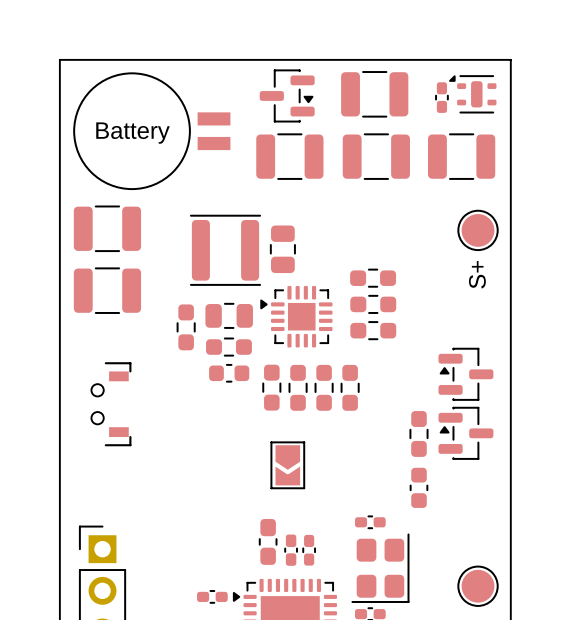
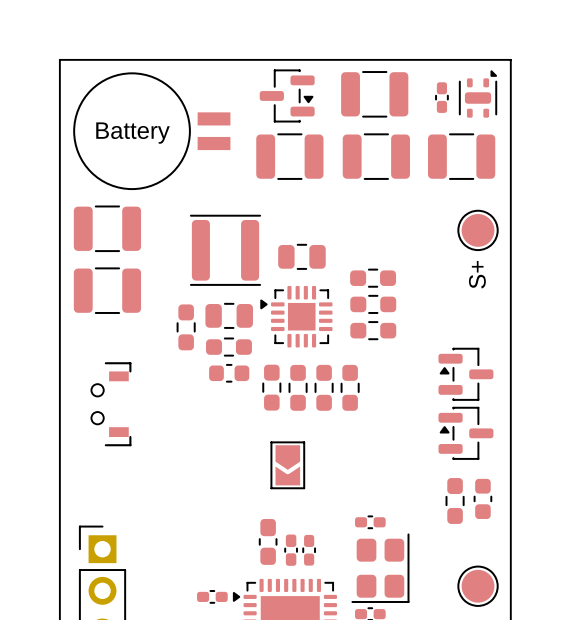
part rotation: 0° (472, 94) -> 90° clockwise (478, 93)
part rotation: 0° (282, 249) -> 90° clockwise (301, 256)
part position: (418, 433) -> (455, 500)
part position: (418, 487) -> (482, 498)

